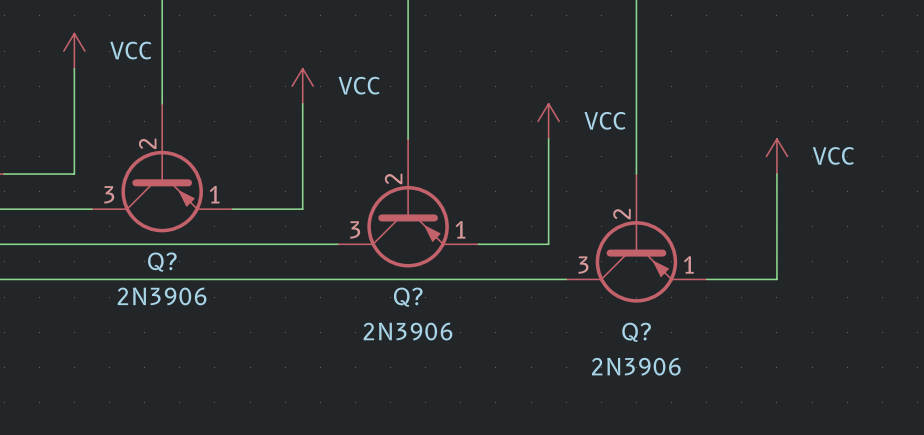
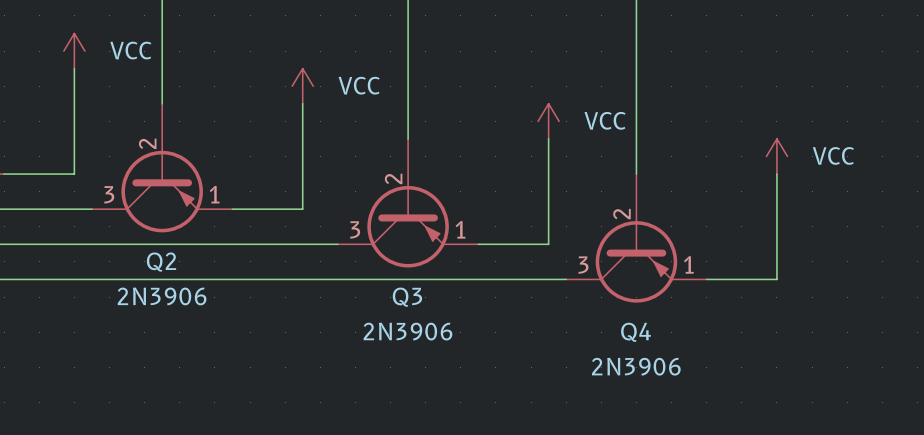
Q? name: Q? (162, 262) -> Q2 (161, 262)
Q? name: Q? (408, 297) -> Q3 (407, 297)
Q? name: Q? (636, 332) -> Q4 (636, 332)

